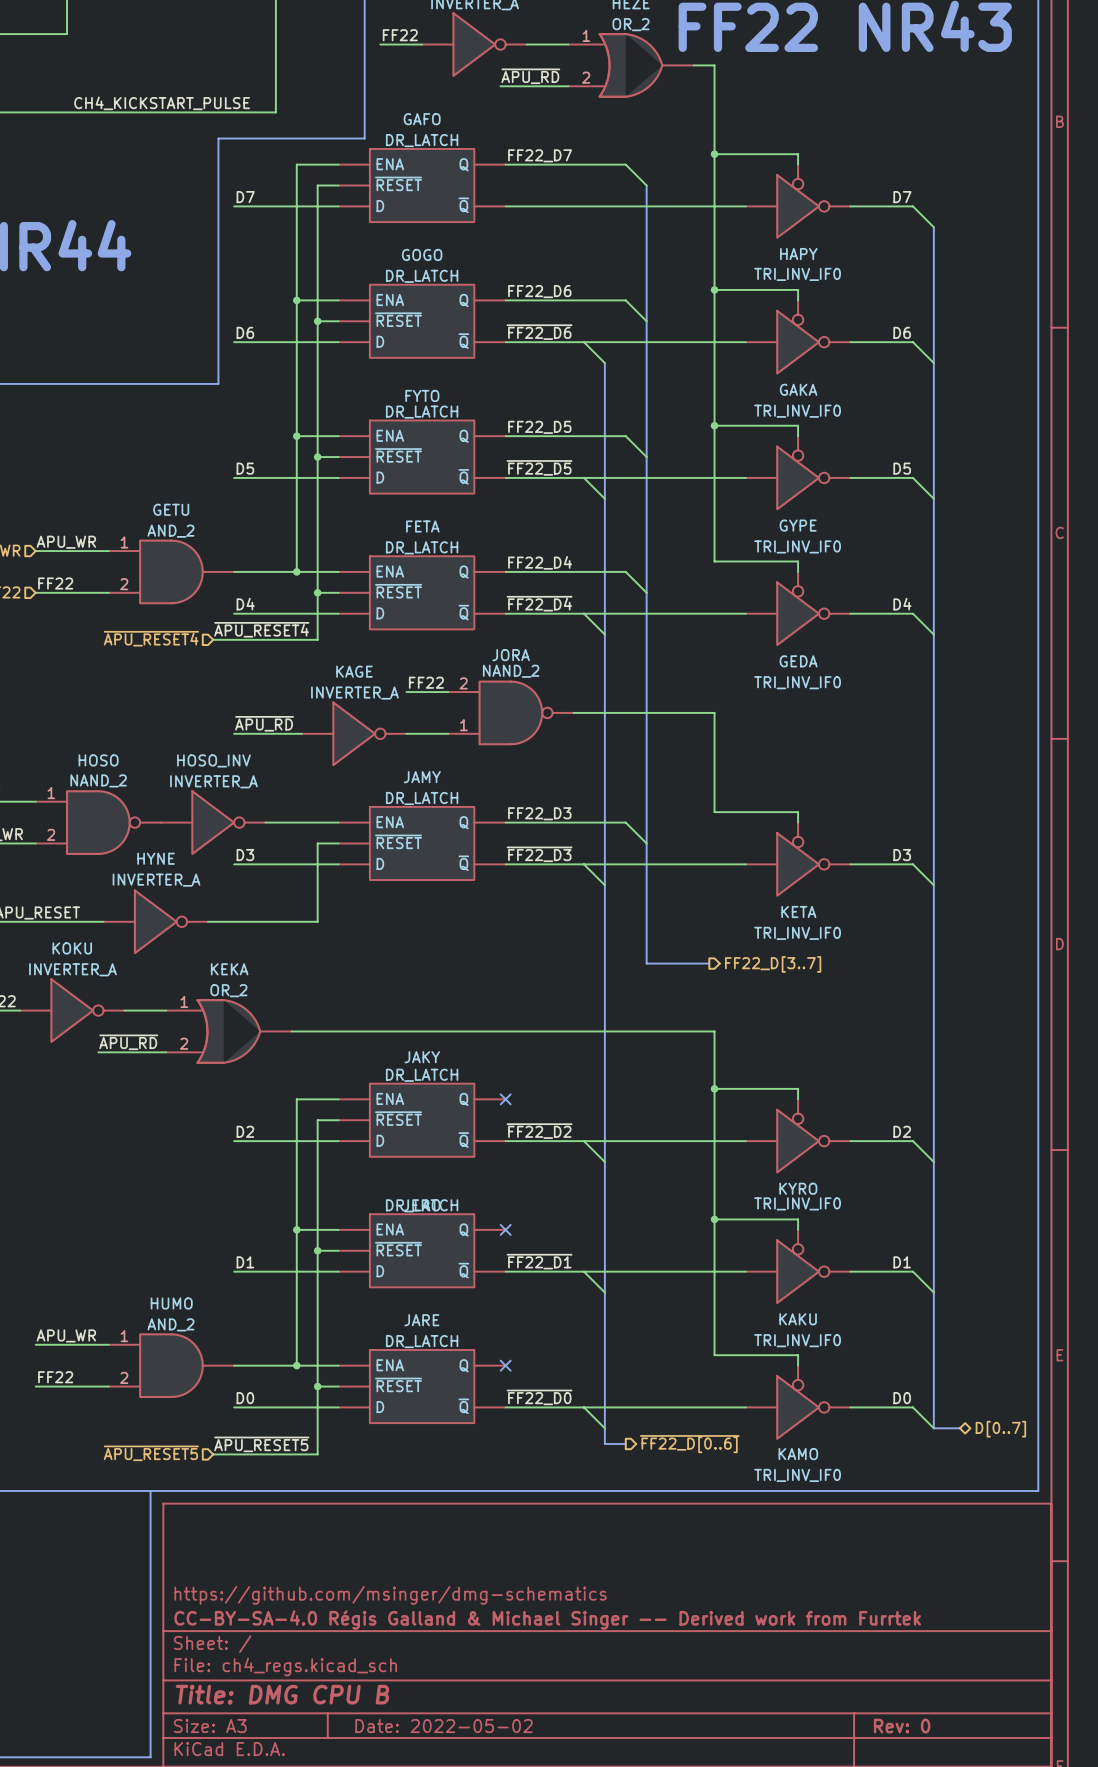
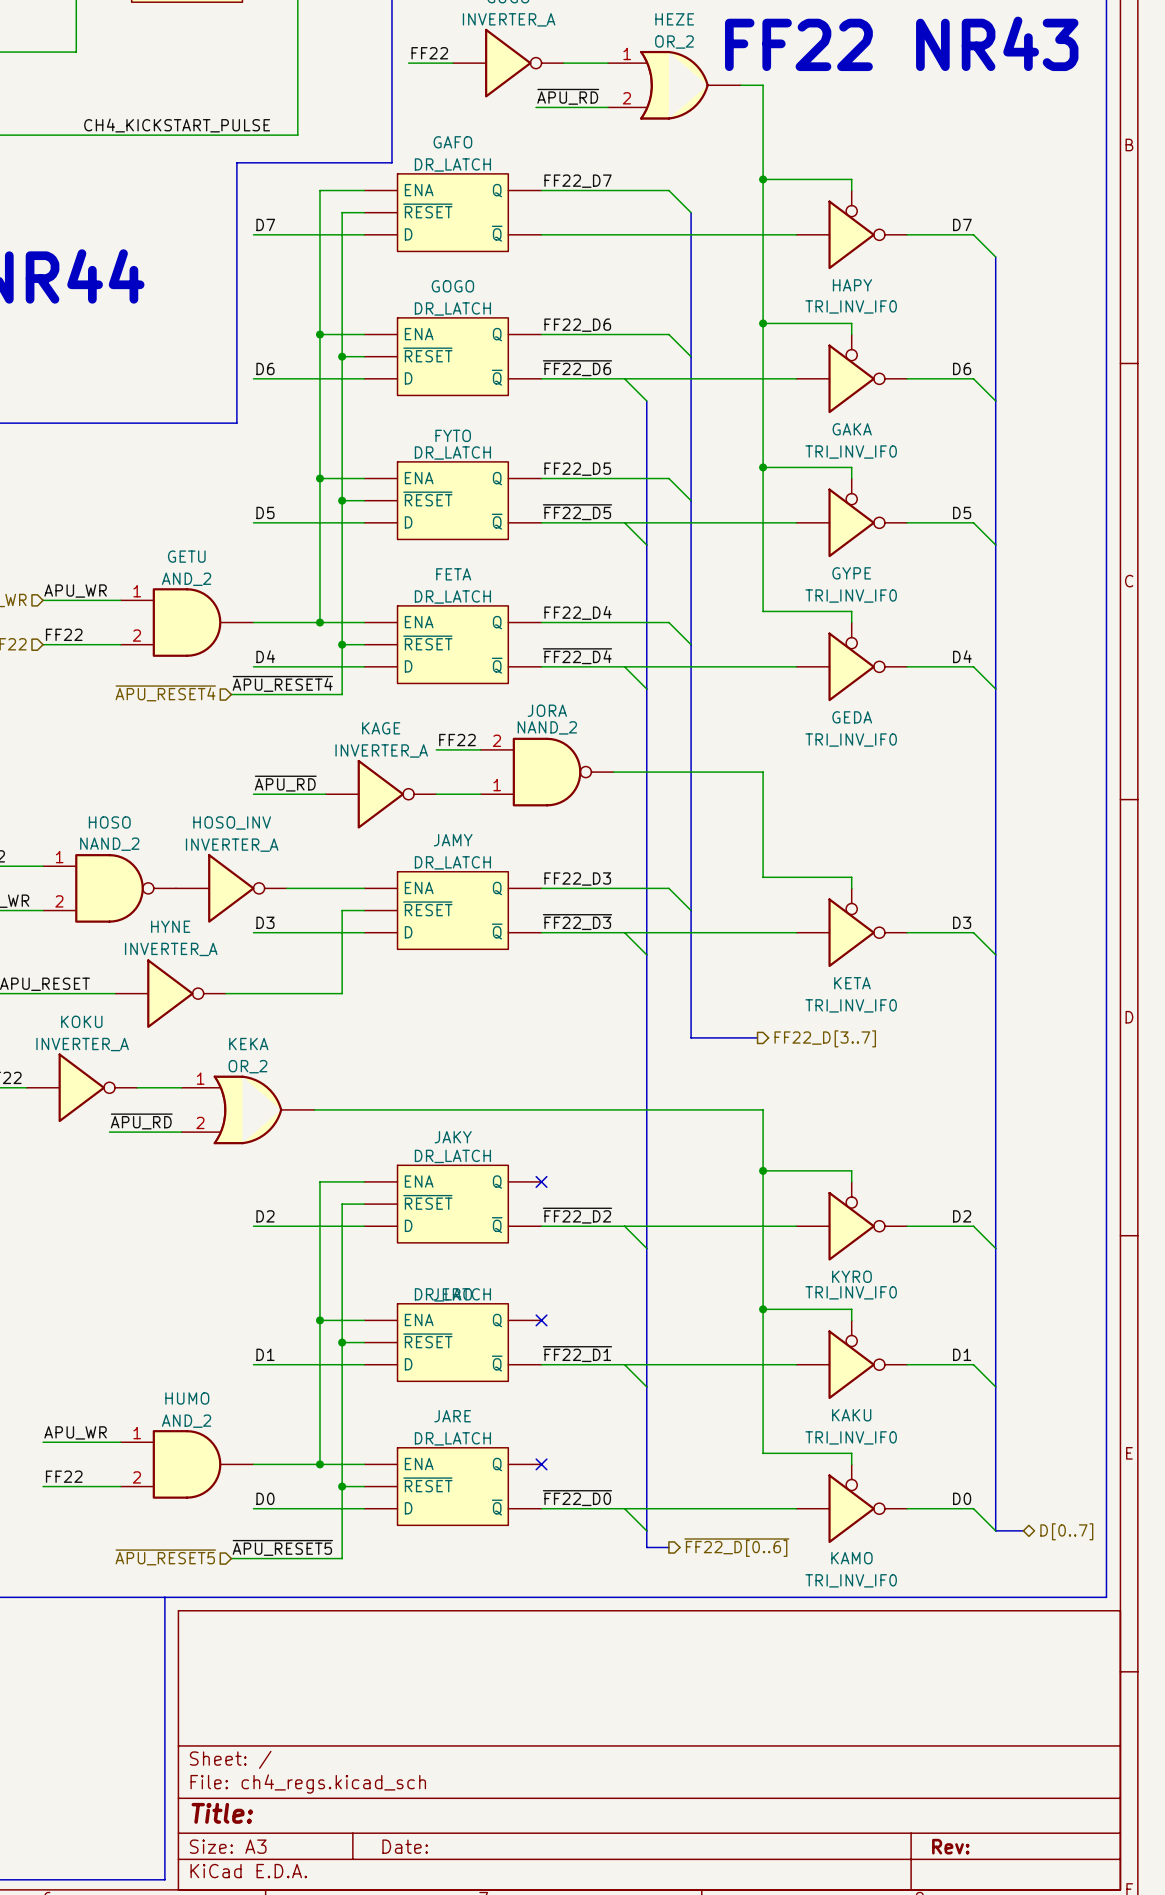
title block: https://github.com/msinger/dmg-schematics (390, 1595) -> none
title block: CC-BY-SA-4.0 Régis Galland & Michael Singer -- Derived work from Furrtek (547, 1620) -> none
title block: Title: DMG CPU B (282, 1694) -> Title: (222, 1813)
title block: Date: 2022-05-02 (444, 1726) -> Date: (405, 1846)
title block: Rev: 0 (902, 1726) -> Rev: (950, 1846)

